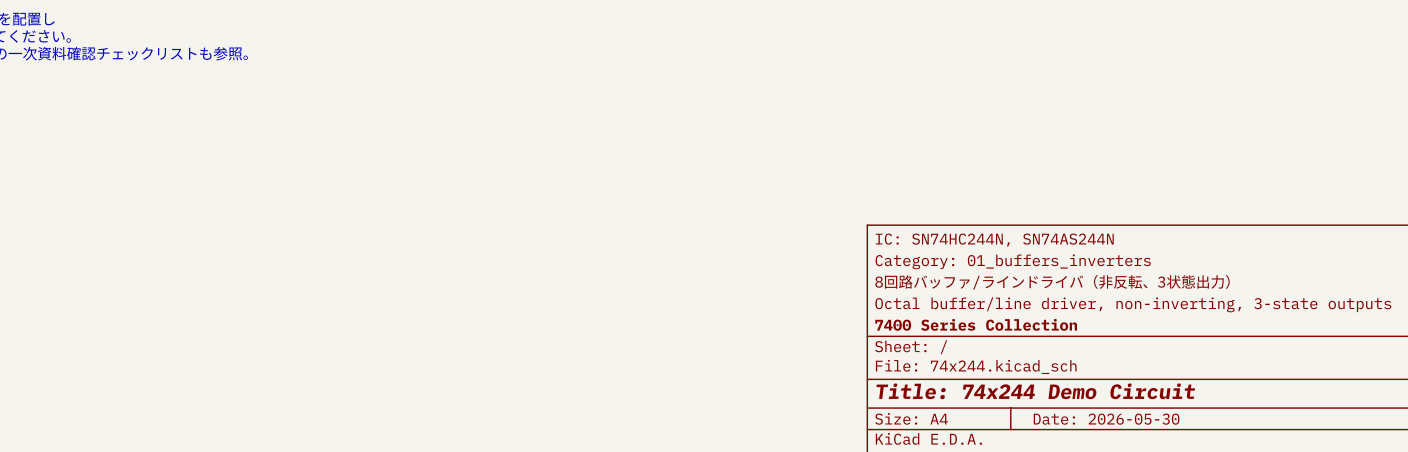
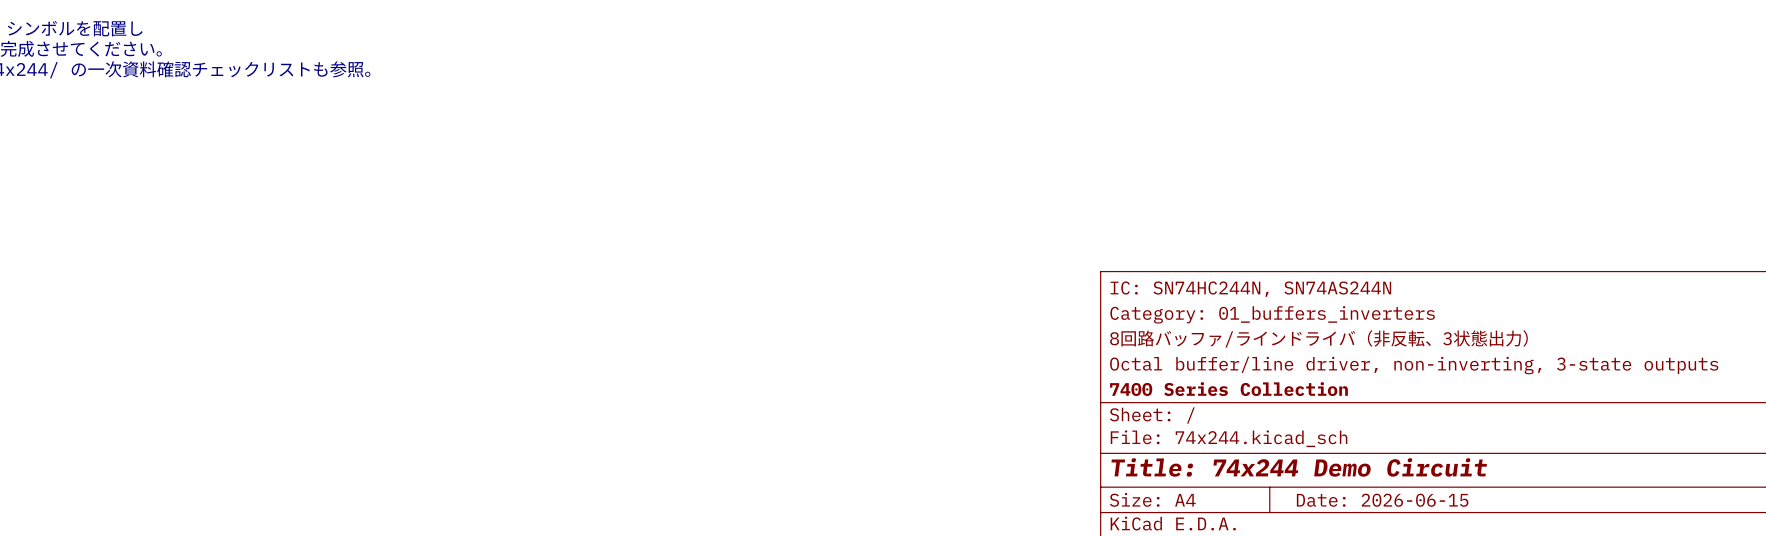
title block: Date: 2026-05-30 (1106, 419) -> Date: 2026-06-15 (1382, 500)

